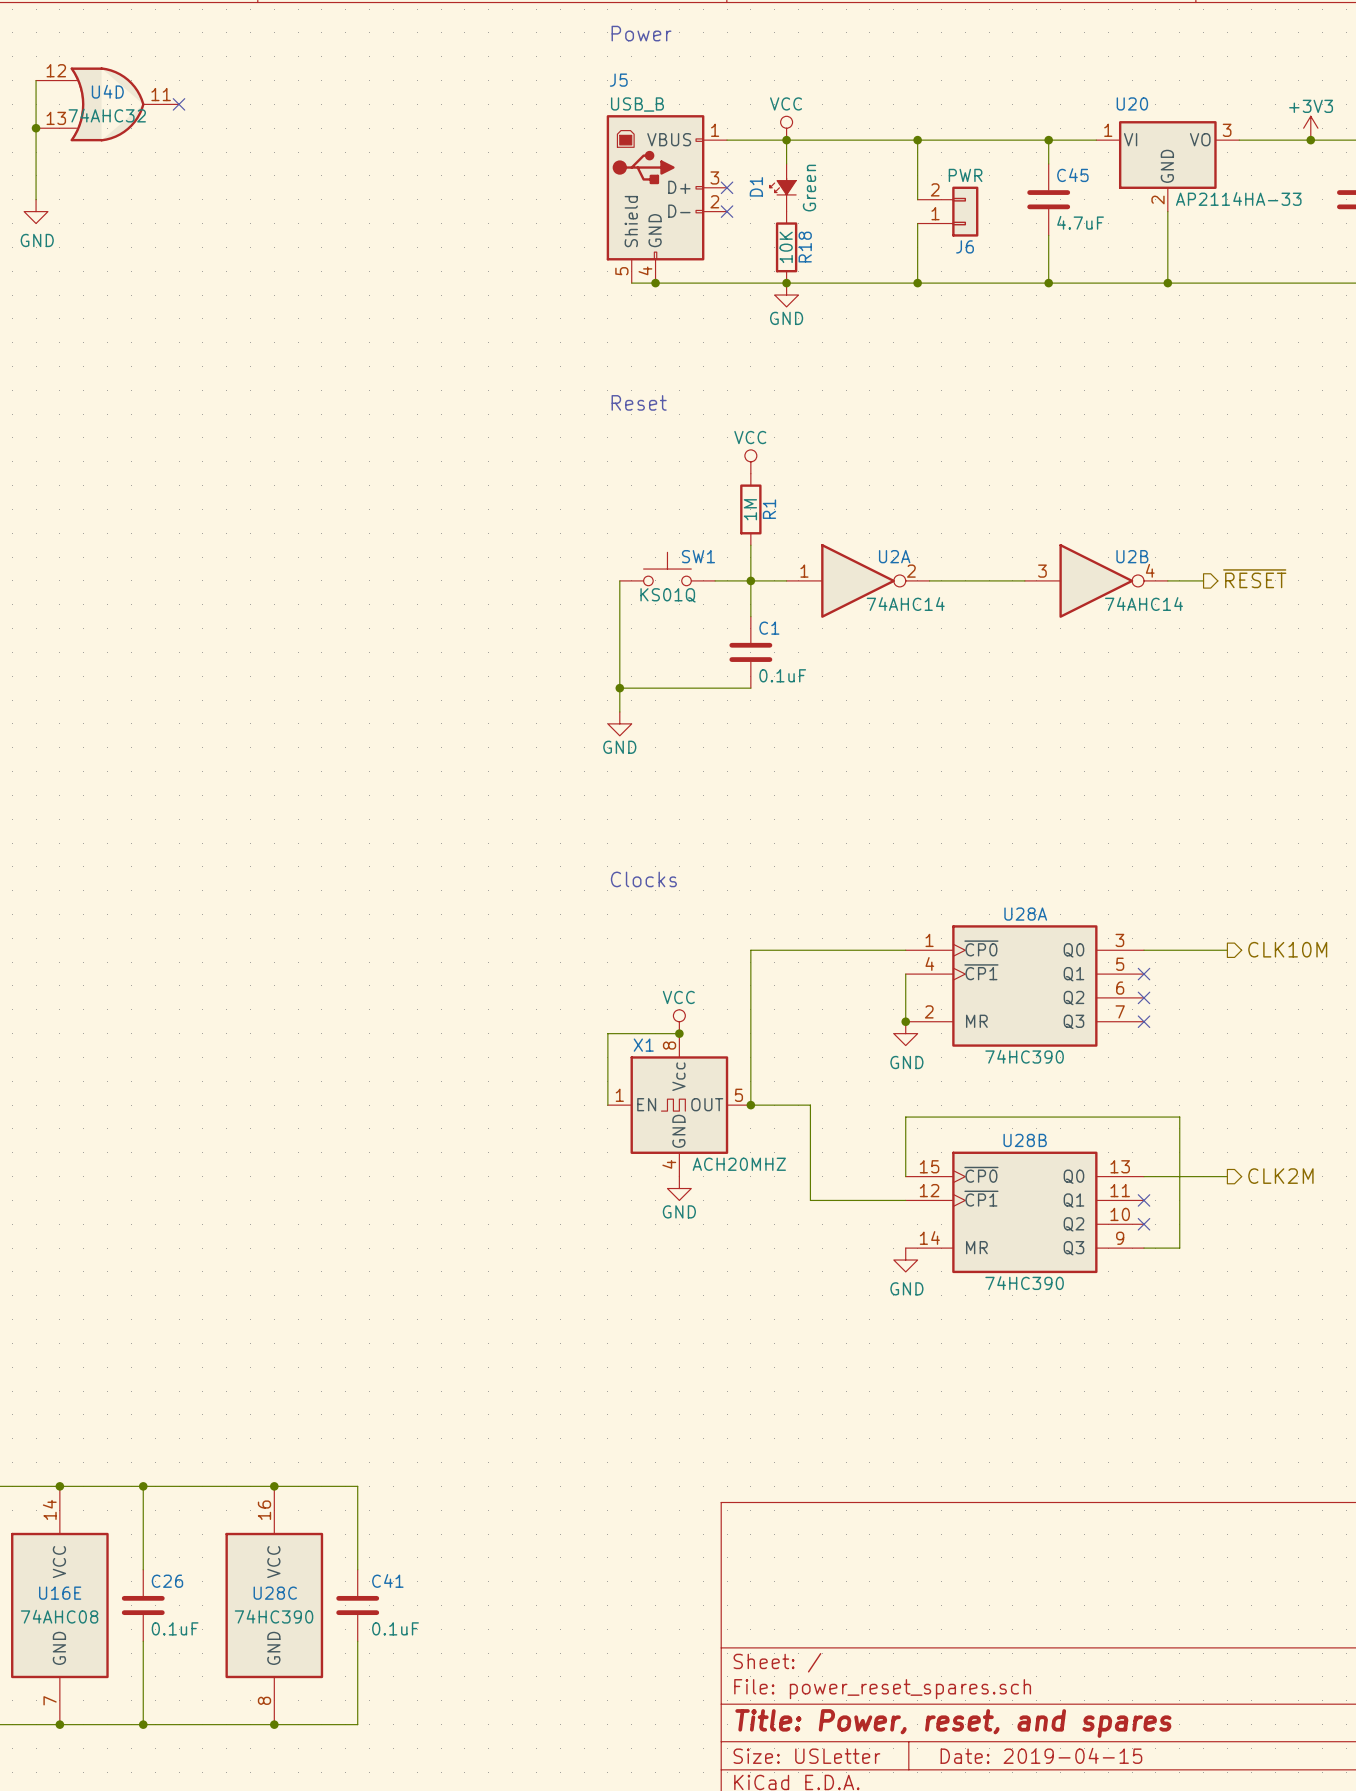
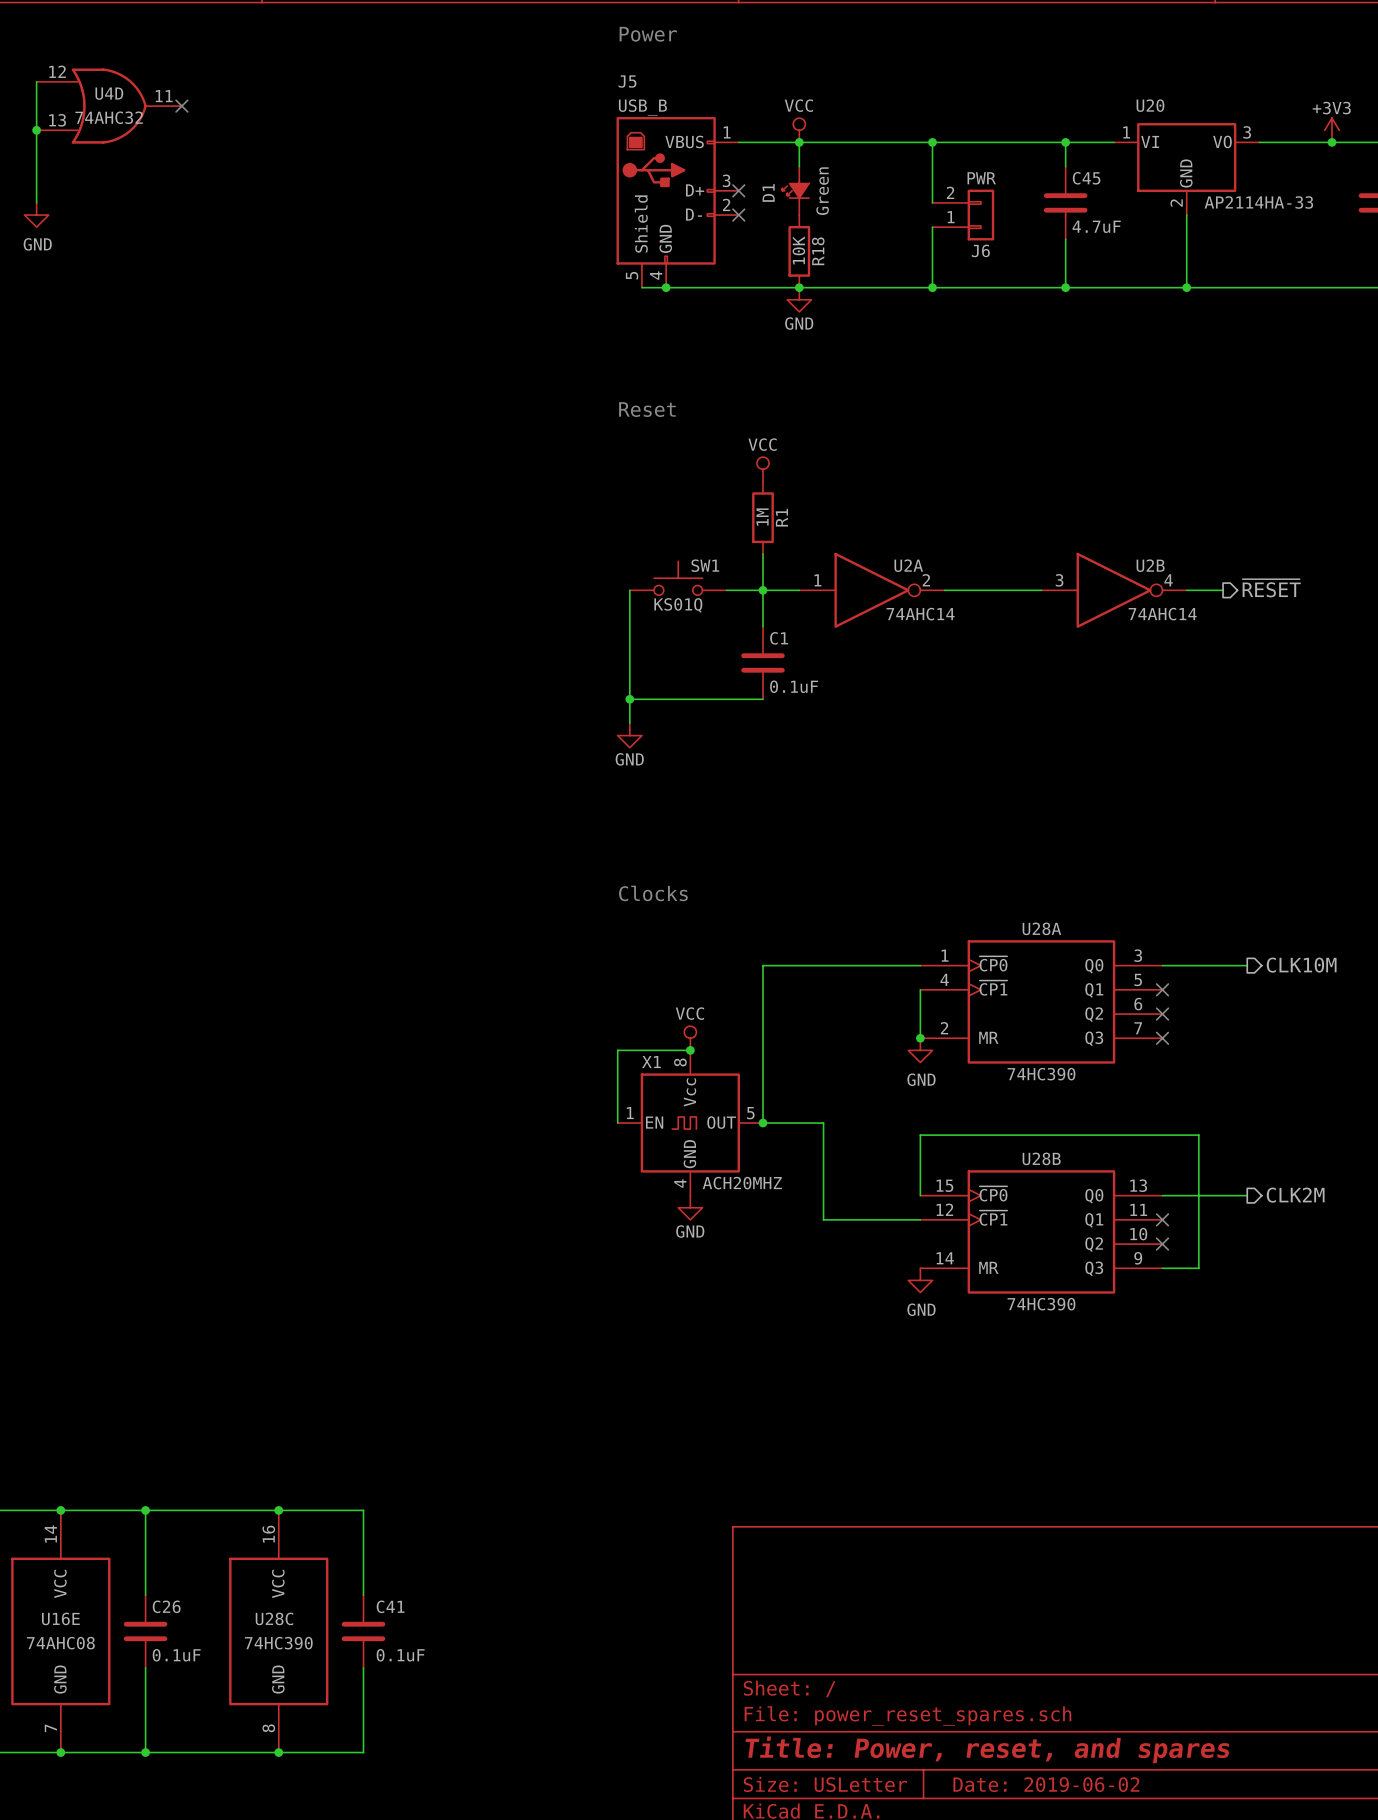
title block: Date: 2019-04-15 (1041, 1755) -> Date: 2019-06-02 (1046, 1784)

